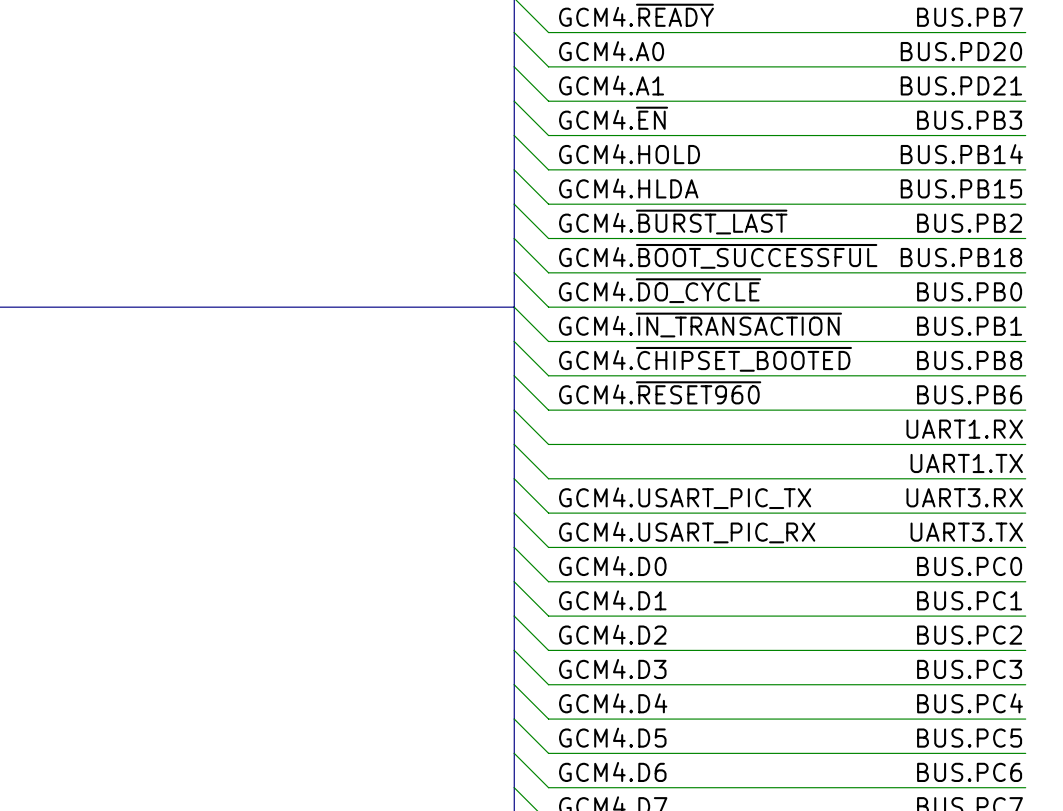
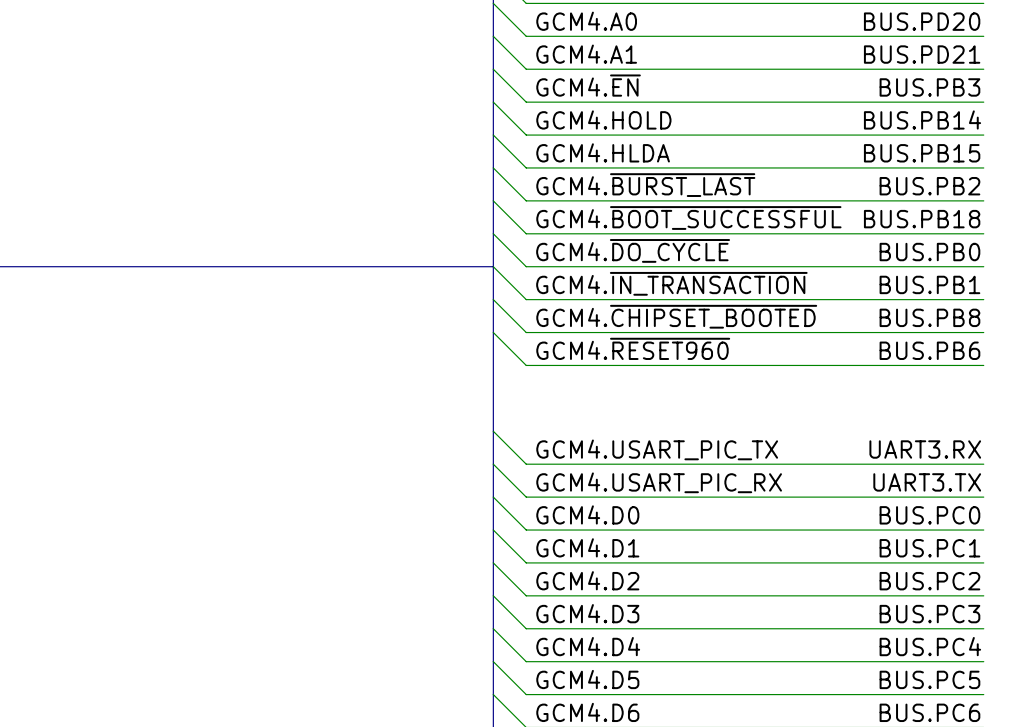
wire: (514, 410) (548, 444) (1025, 444) -> none
label: UART1.RX (964, 429) -> none
wire: (514, 444) (548, 478) (1025, 478) -> none
label: UART1.TX (966, 463) -> none

